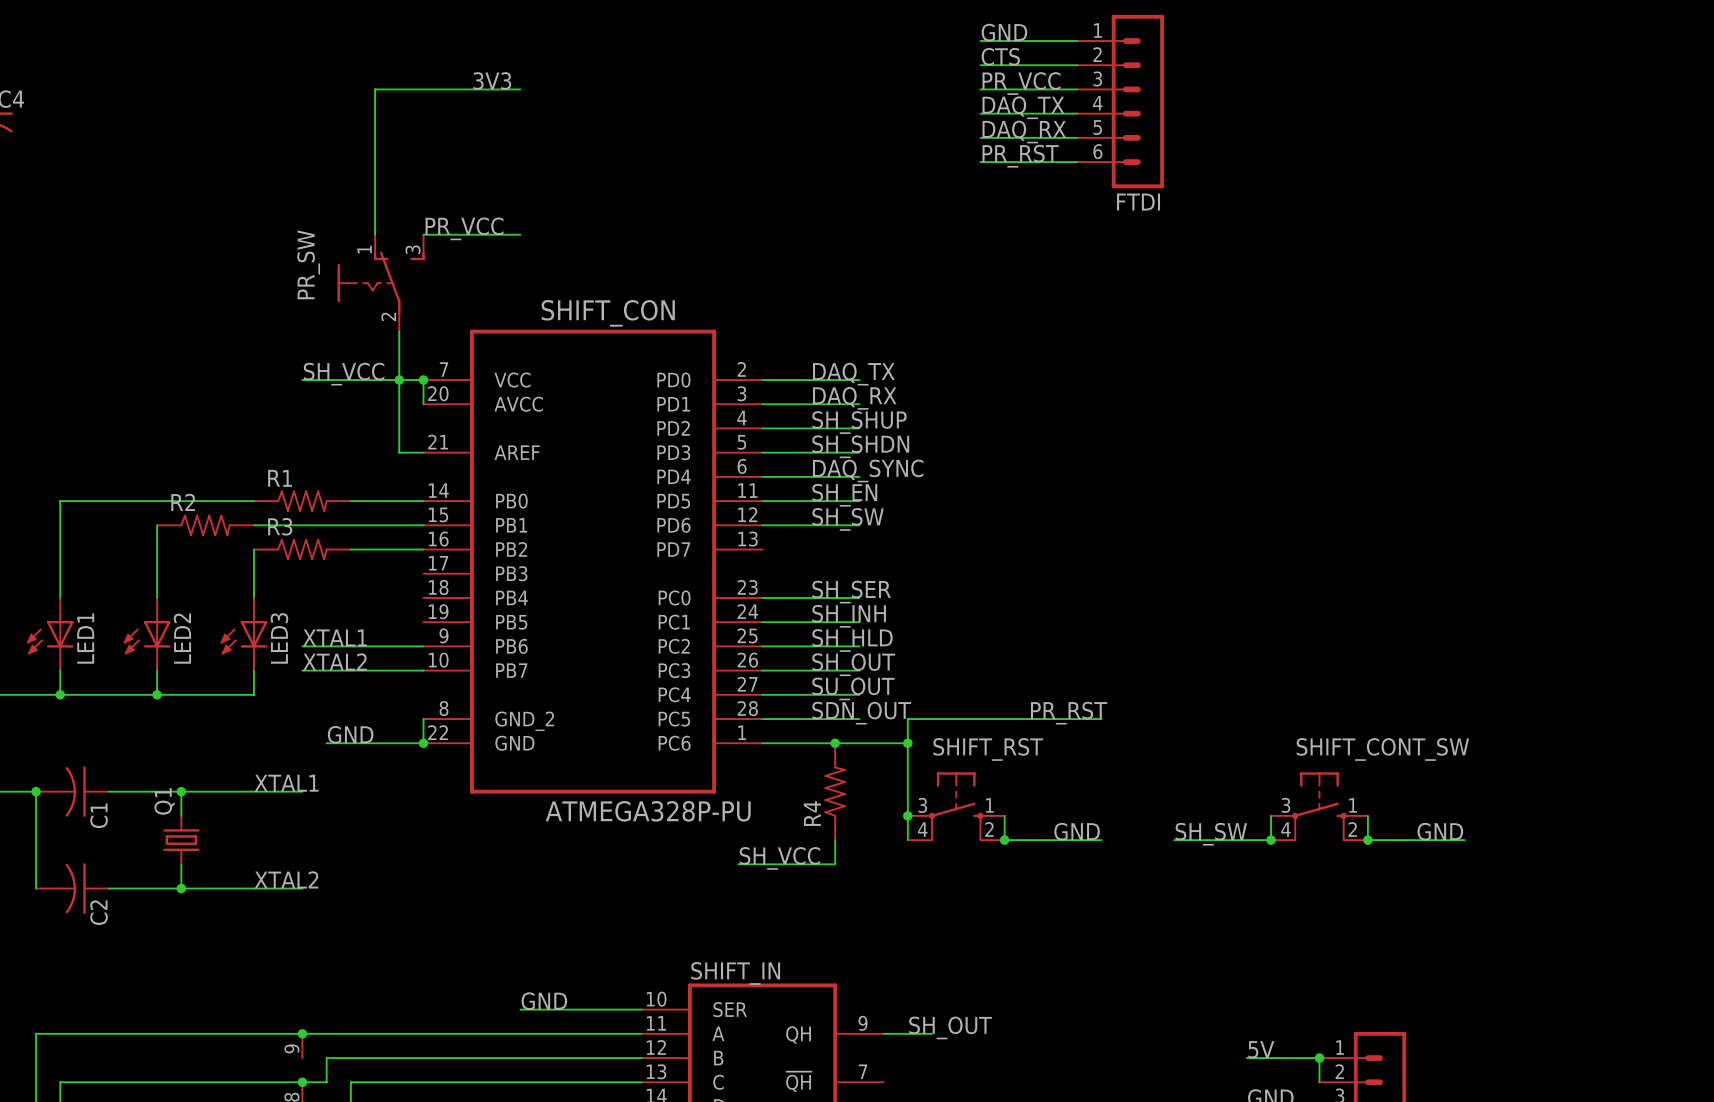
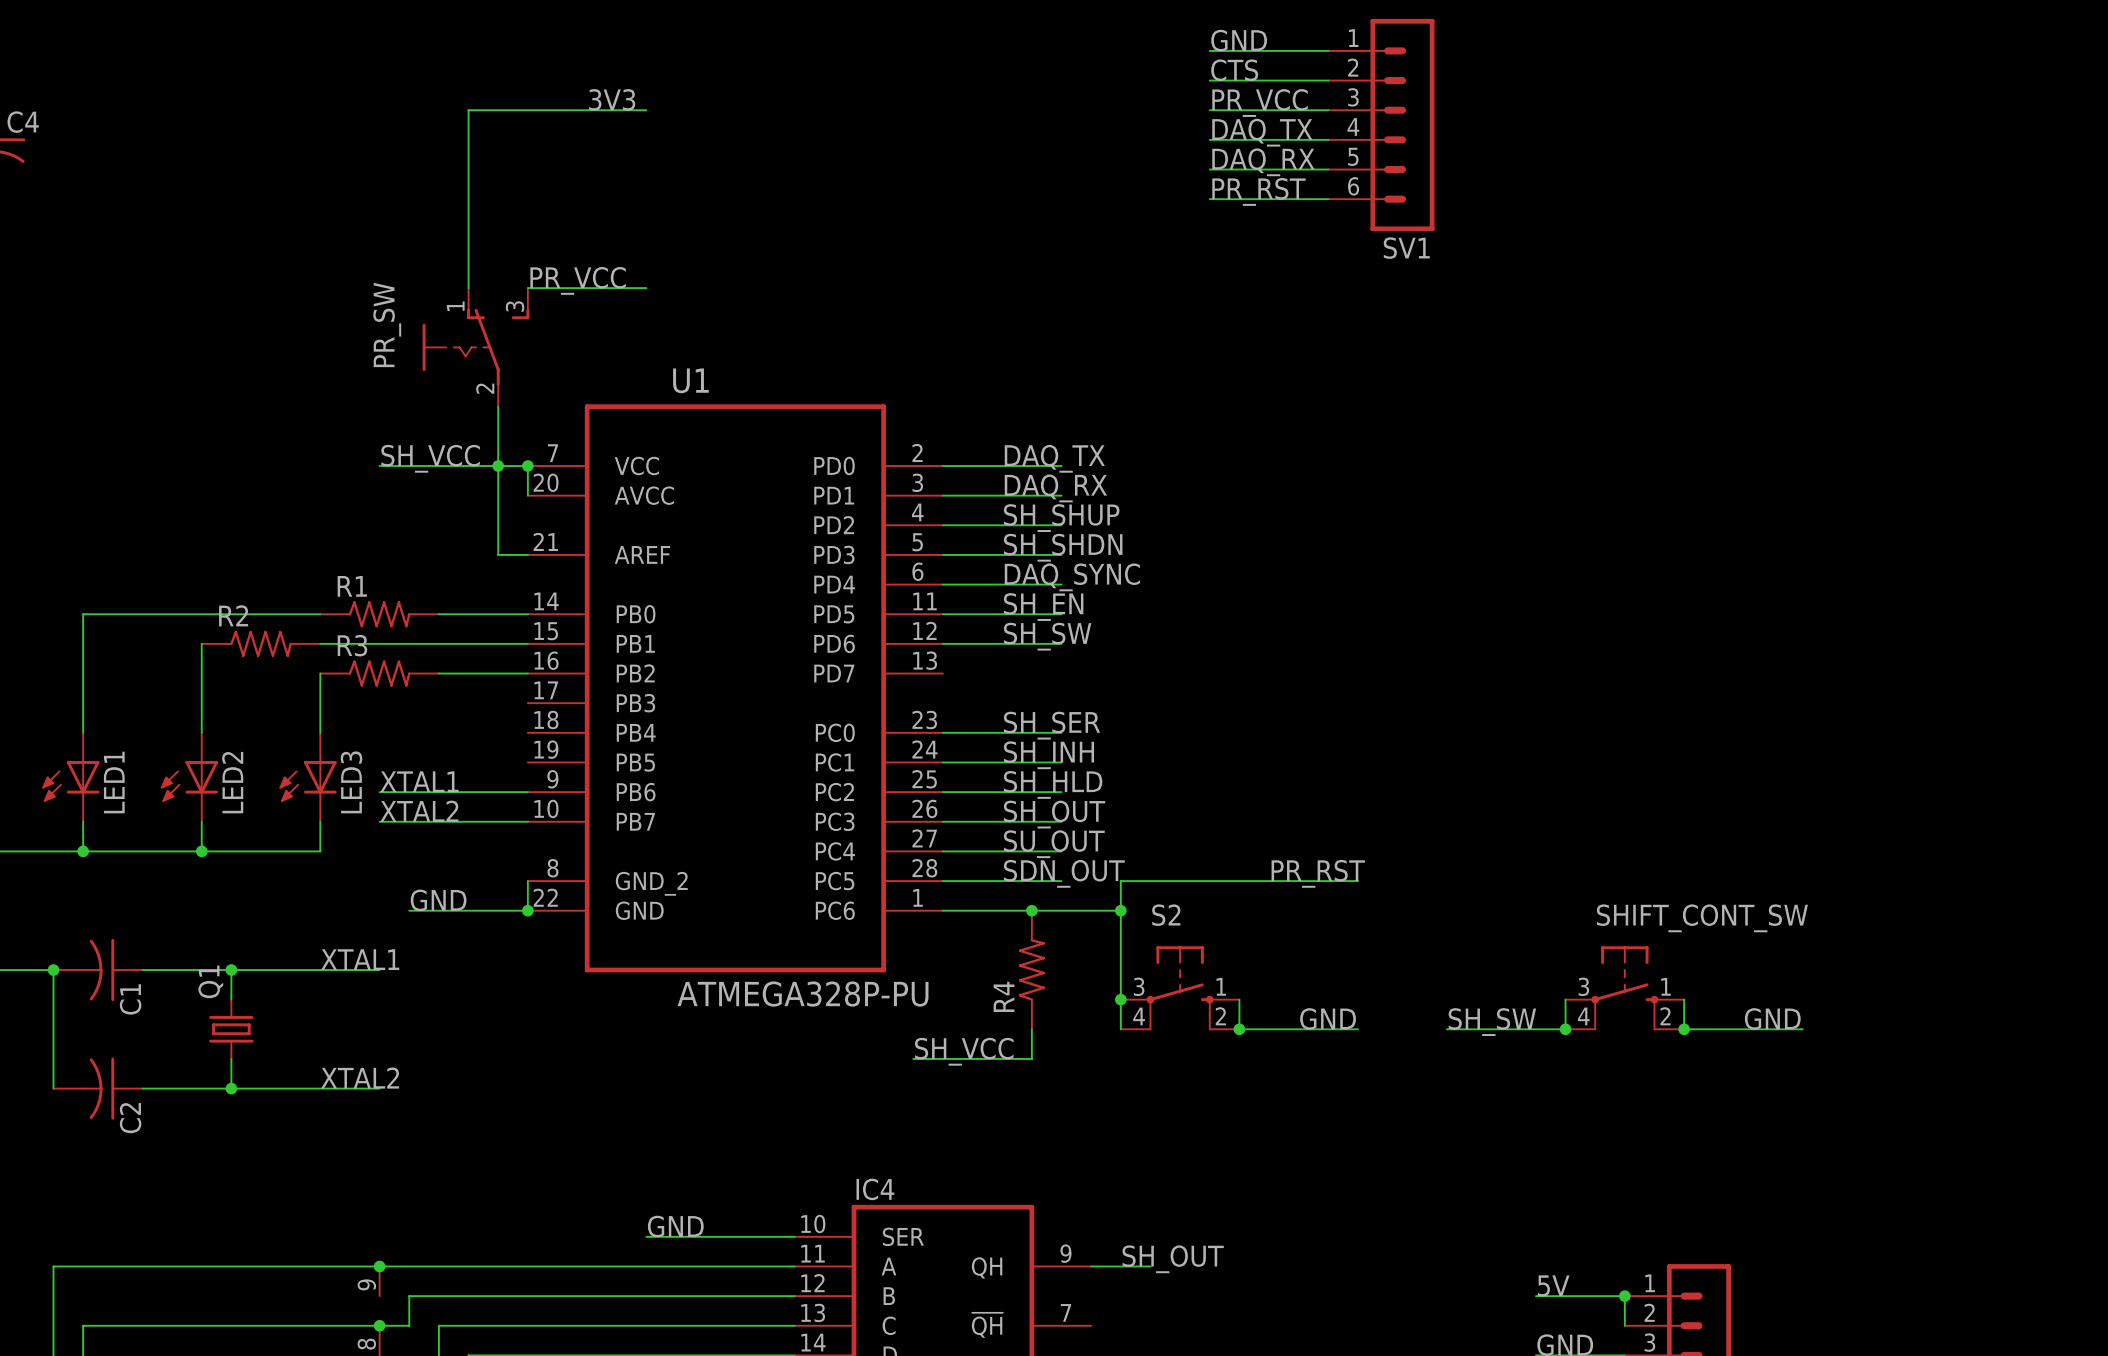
FTDI name: FTDI (1138, 202) -> SV1 (1406, 248)
SHIFT_CON name: SHIFT_CON (608, 313) -> U1 (690, 380)
SHIFT_RST name: SHIFT_RST (988, 749) -> S2 (1166, 915)
SHIFT_IN name: SHIFT_IN (735, 973) -> IC4 (875, 1189)

